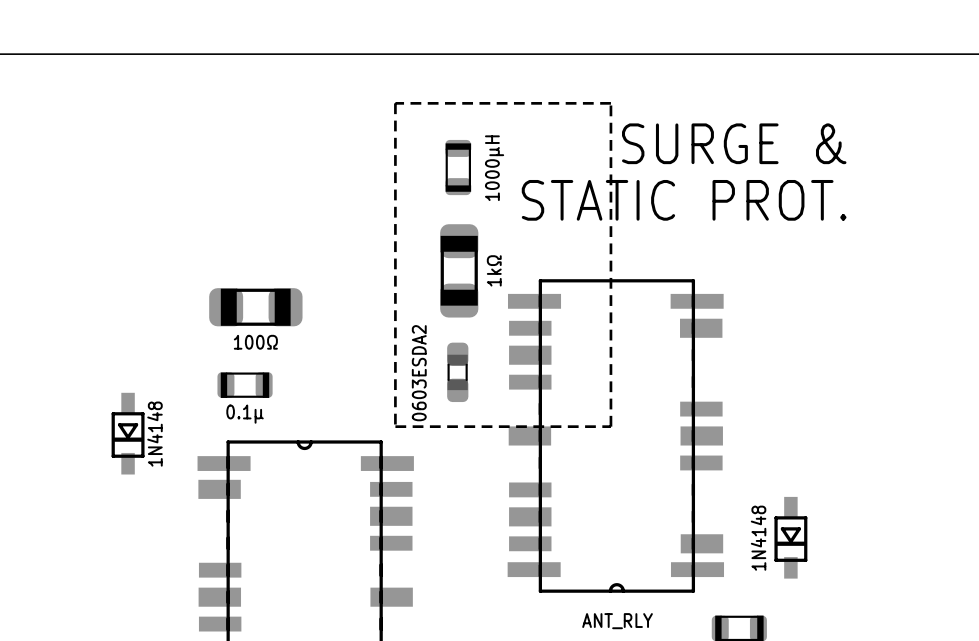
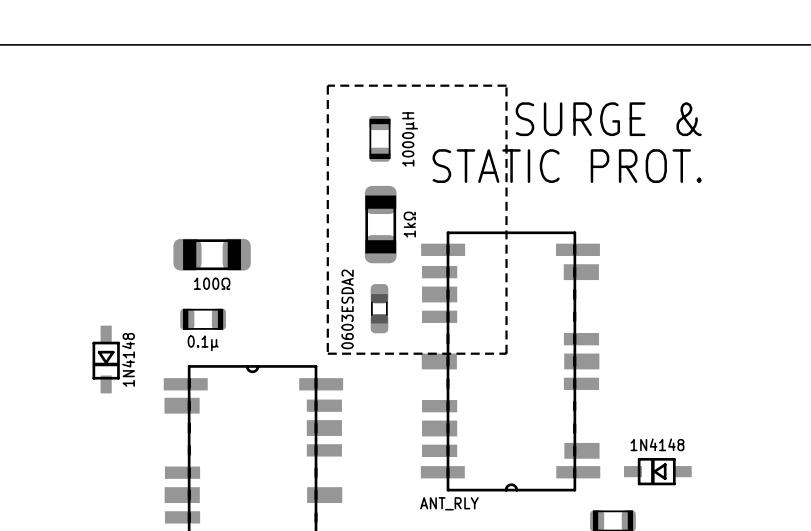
part rotation: 0° (790, 537) -> 90° clockwise (657, 471)
part value position: ANT_RLY (617, 621) -> ANT_RLY (449, 503)

